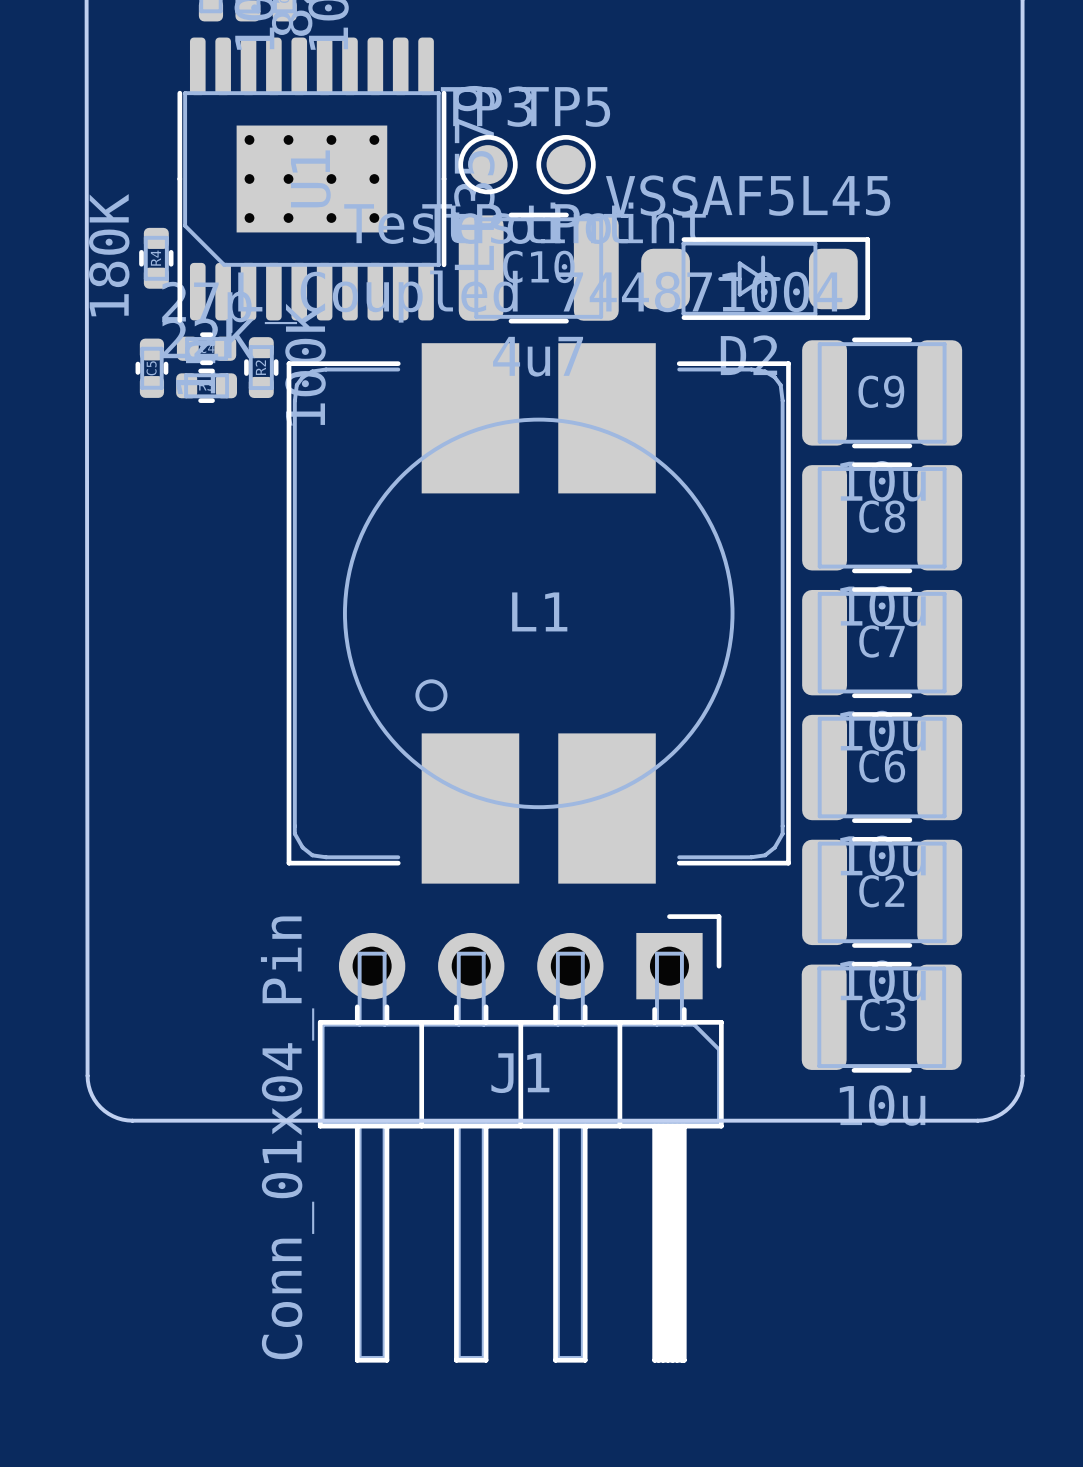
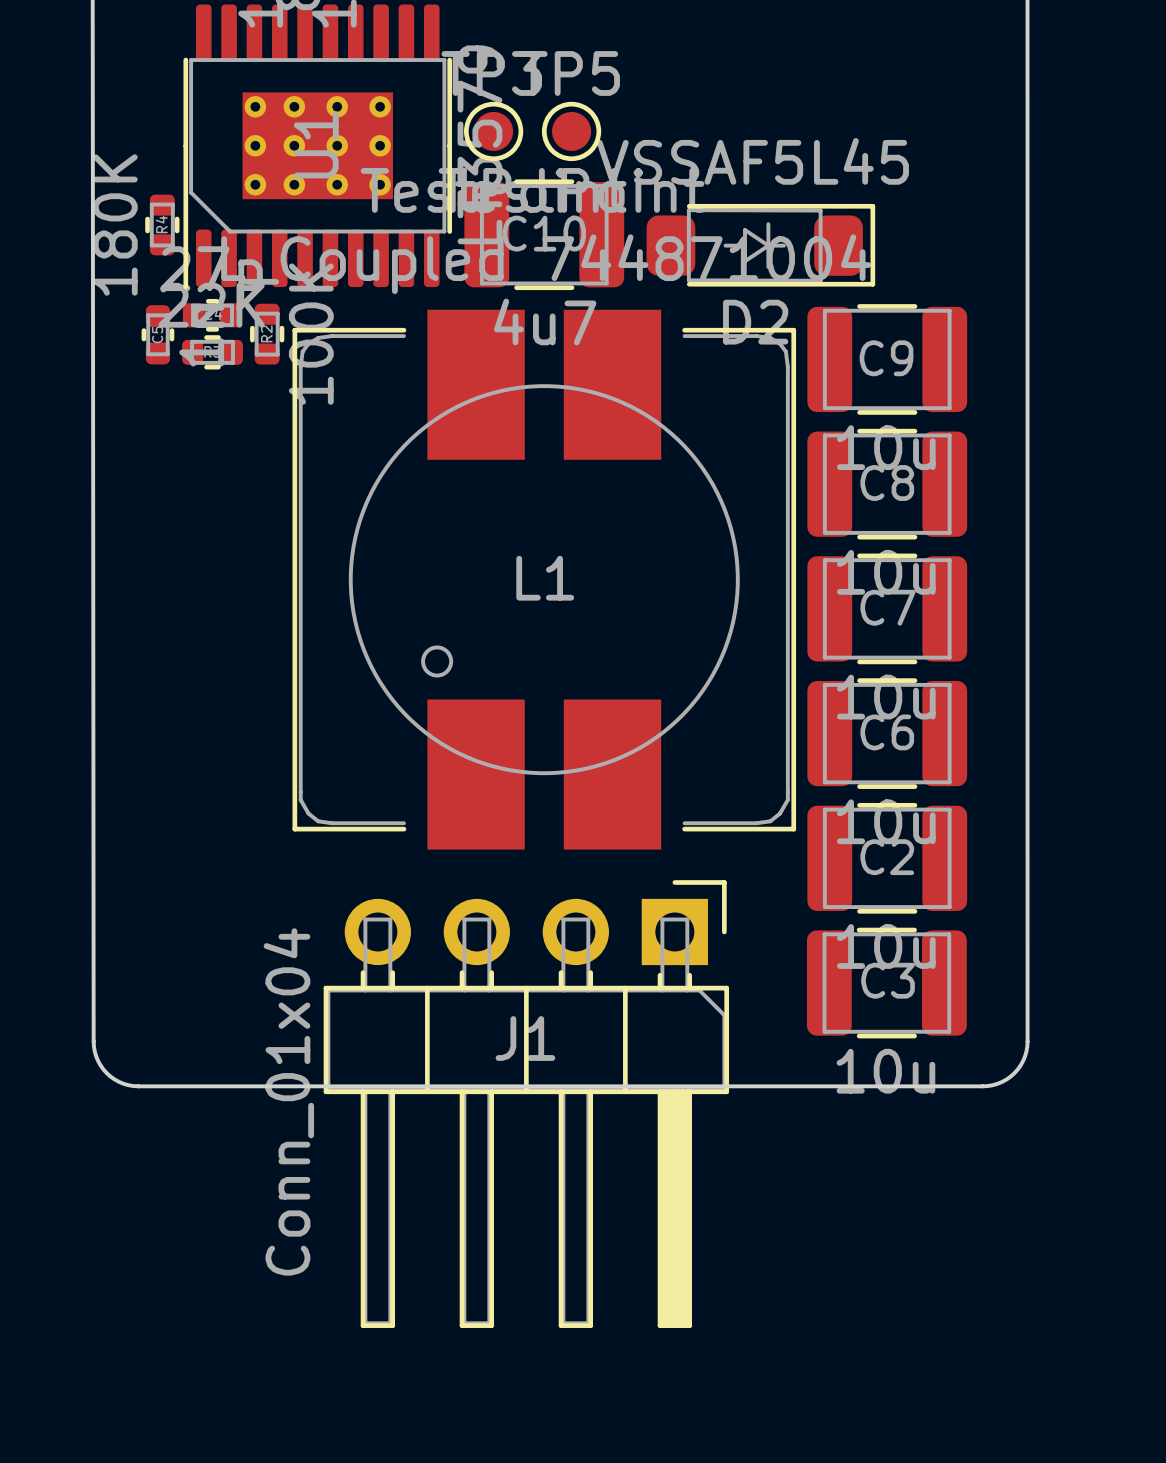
J1 value: Conn_01x04_Pin (287, 1137) -> Conn_01x04 (288, 1101)

